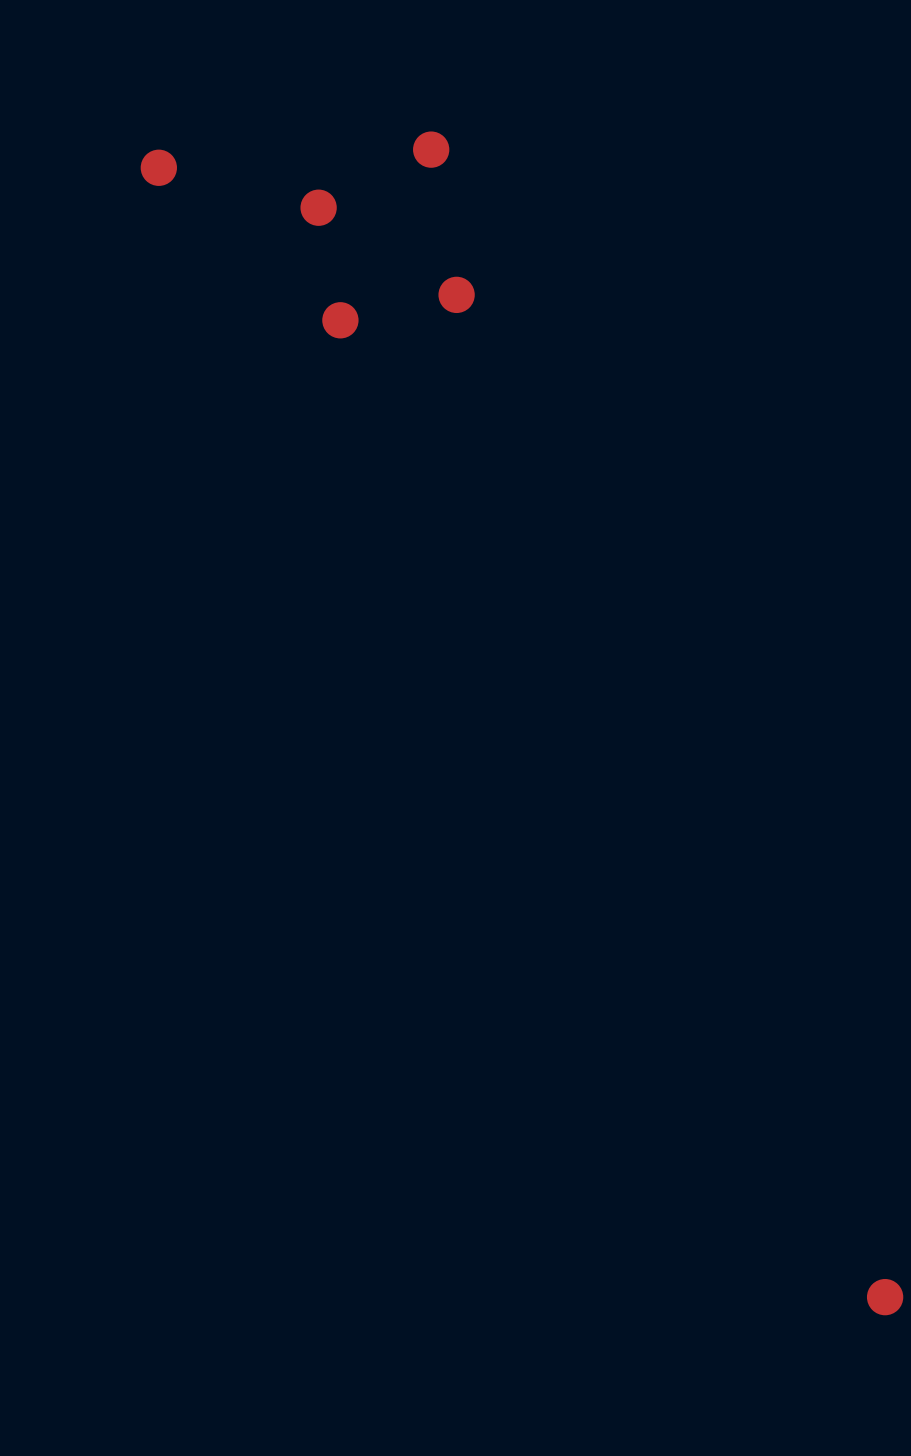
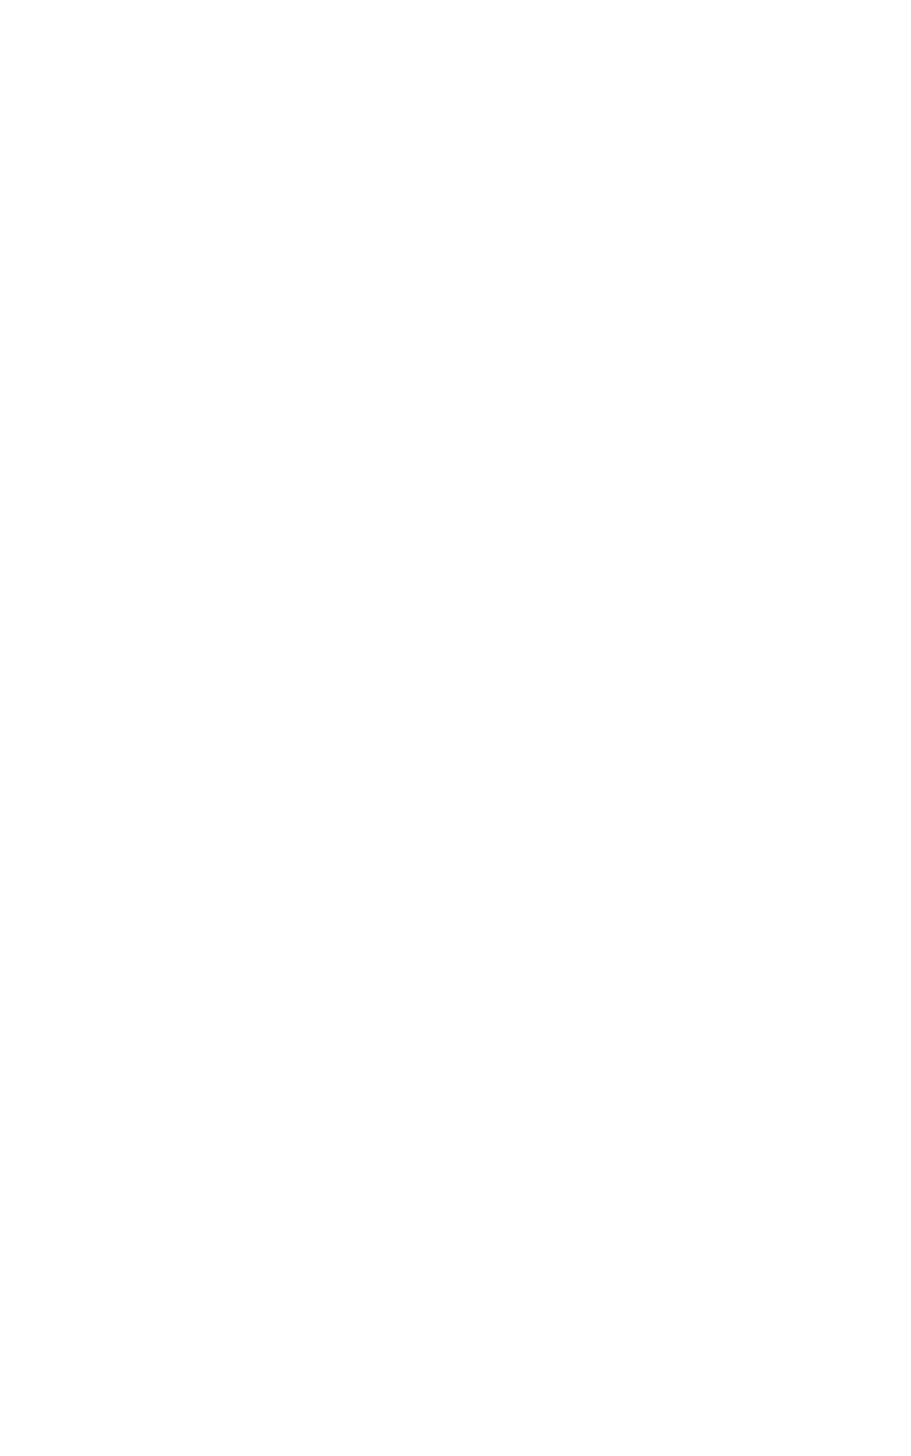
part: (431, 149) -> none
part: (158, 167) -> none
part: (318, 207) -> none
part: (456, 294) -> none
part: (340, 320) -> none
part: (885, 1297) -> none

